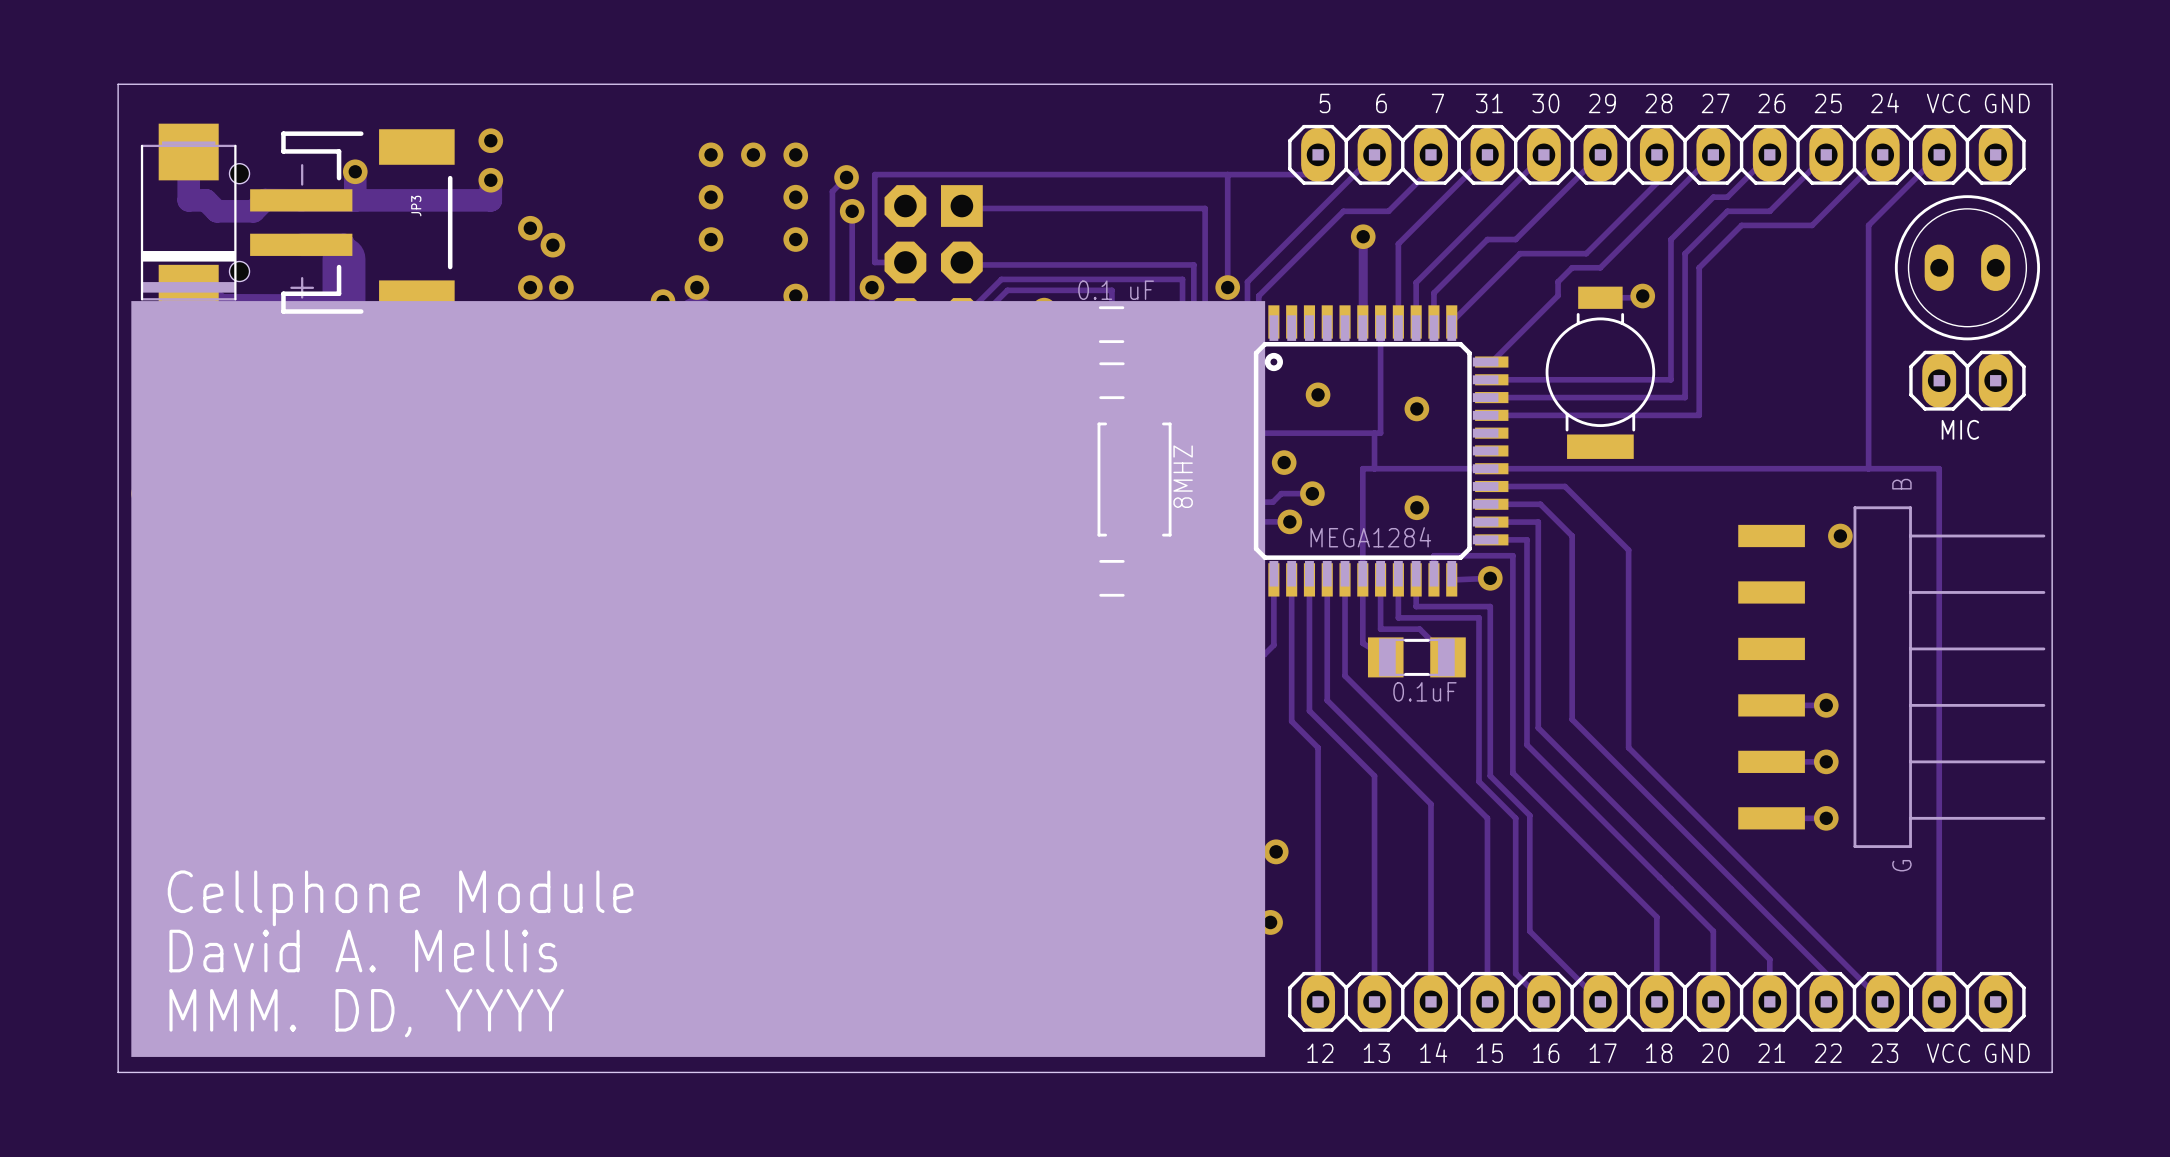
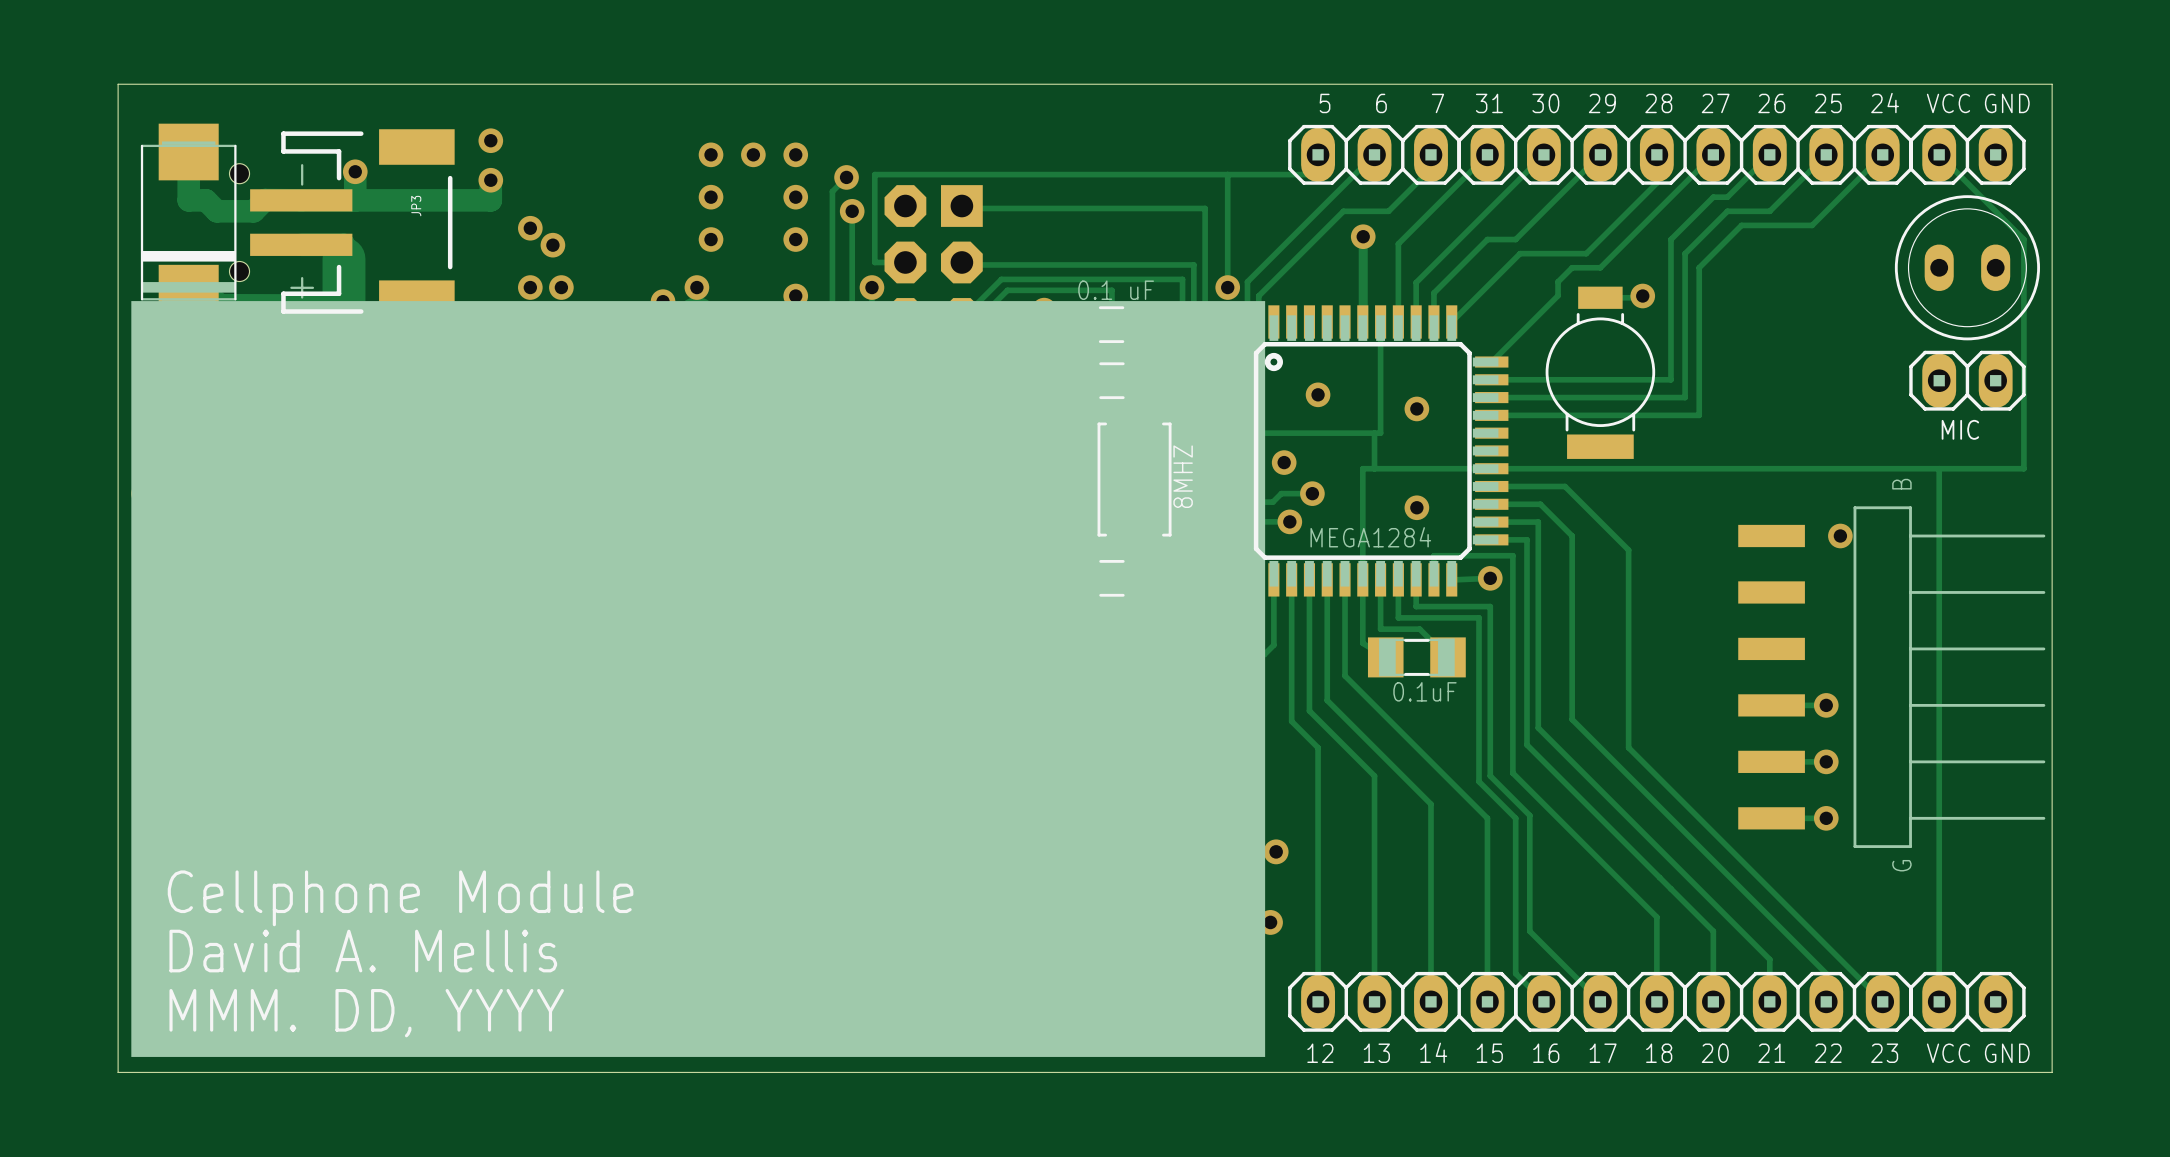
track: (1939, 154) (1868, 225) (1868, 468) -> (1939, 154) (2023, 239) (2023, 468) (1939, 468)

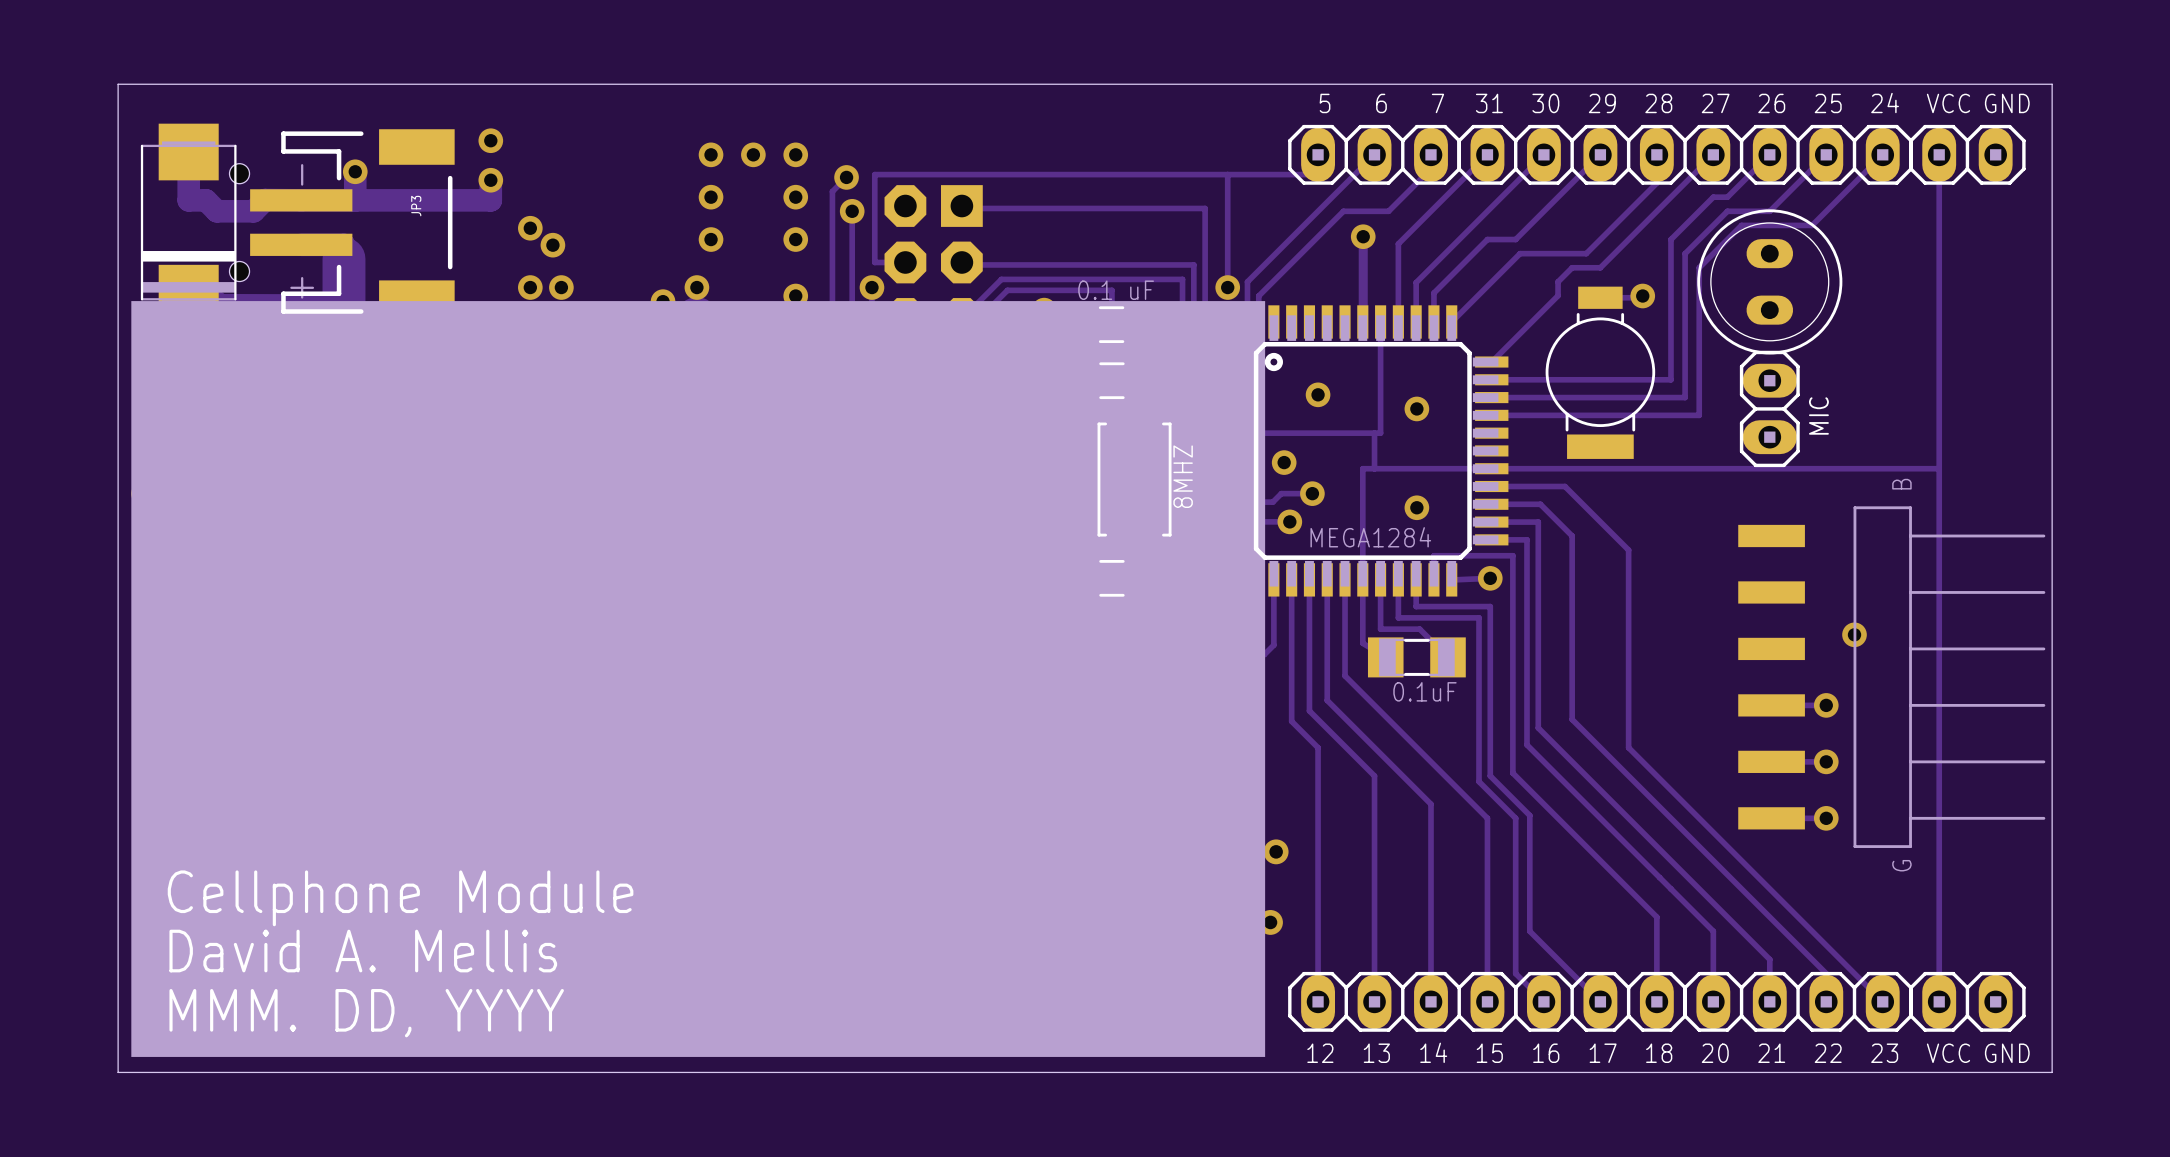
track: (1939, 154) (2023, 239) (2023, 468) (1939, 468) -> (1939, 154) (1939, 468)
part rotation: 0° (1967, 267) -> 90° clockwise (1769, 281)
part position: (1967, 267) -> (1769, 281)
MIC rotation: 0° (1967, 380) -> 90° clockwise (1769, 408)
MIC position: (1967, 380) -> (1769, 408)
MIC name position: MIC (1960, 429) -> MIC (1818, 415)
via position: (1840, 535) -> (1854, 634)

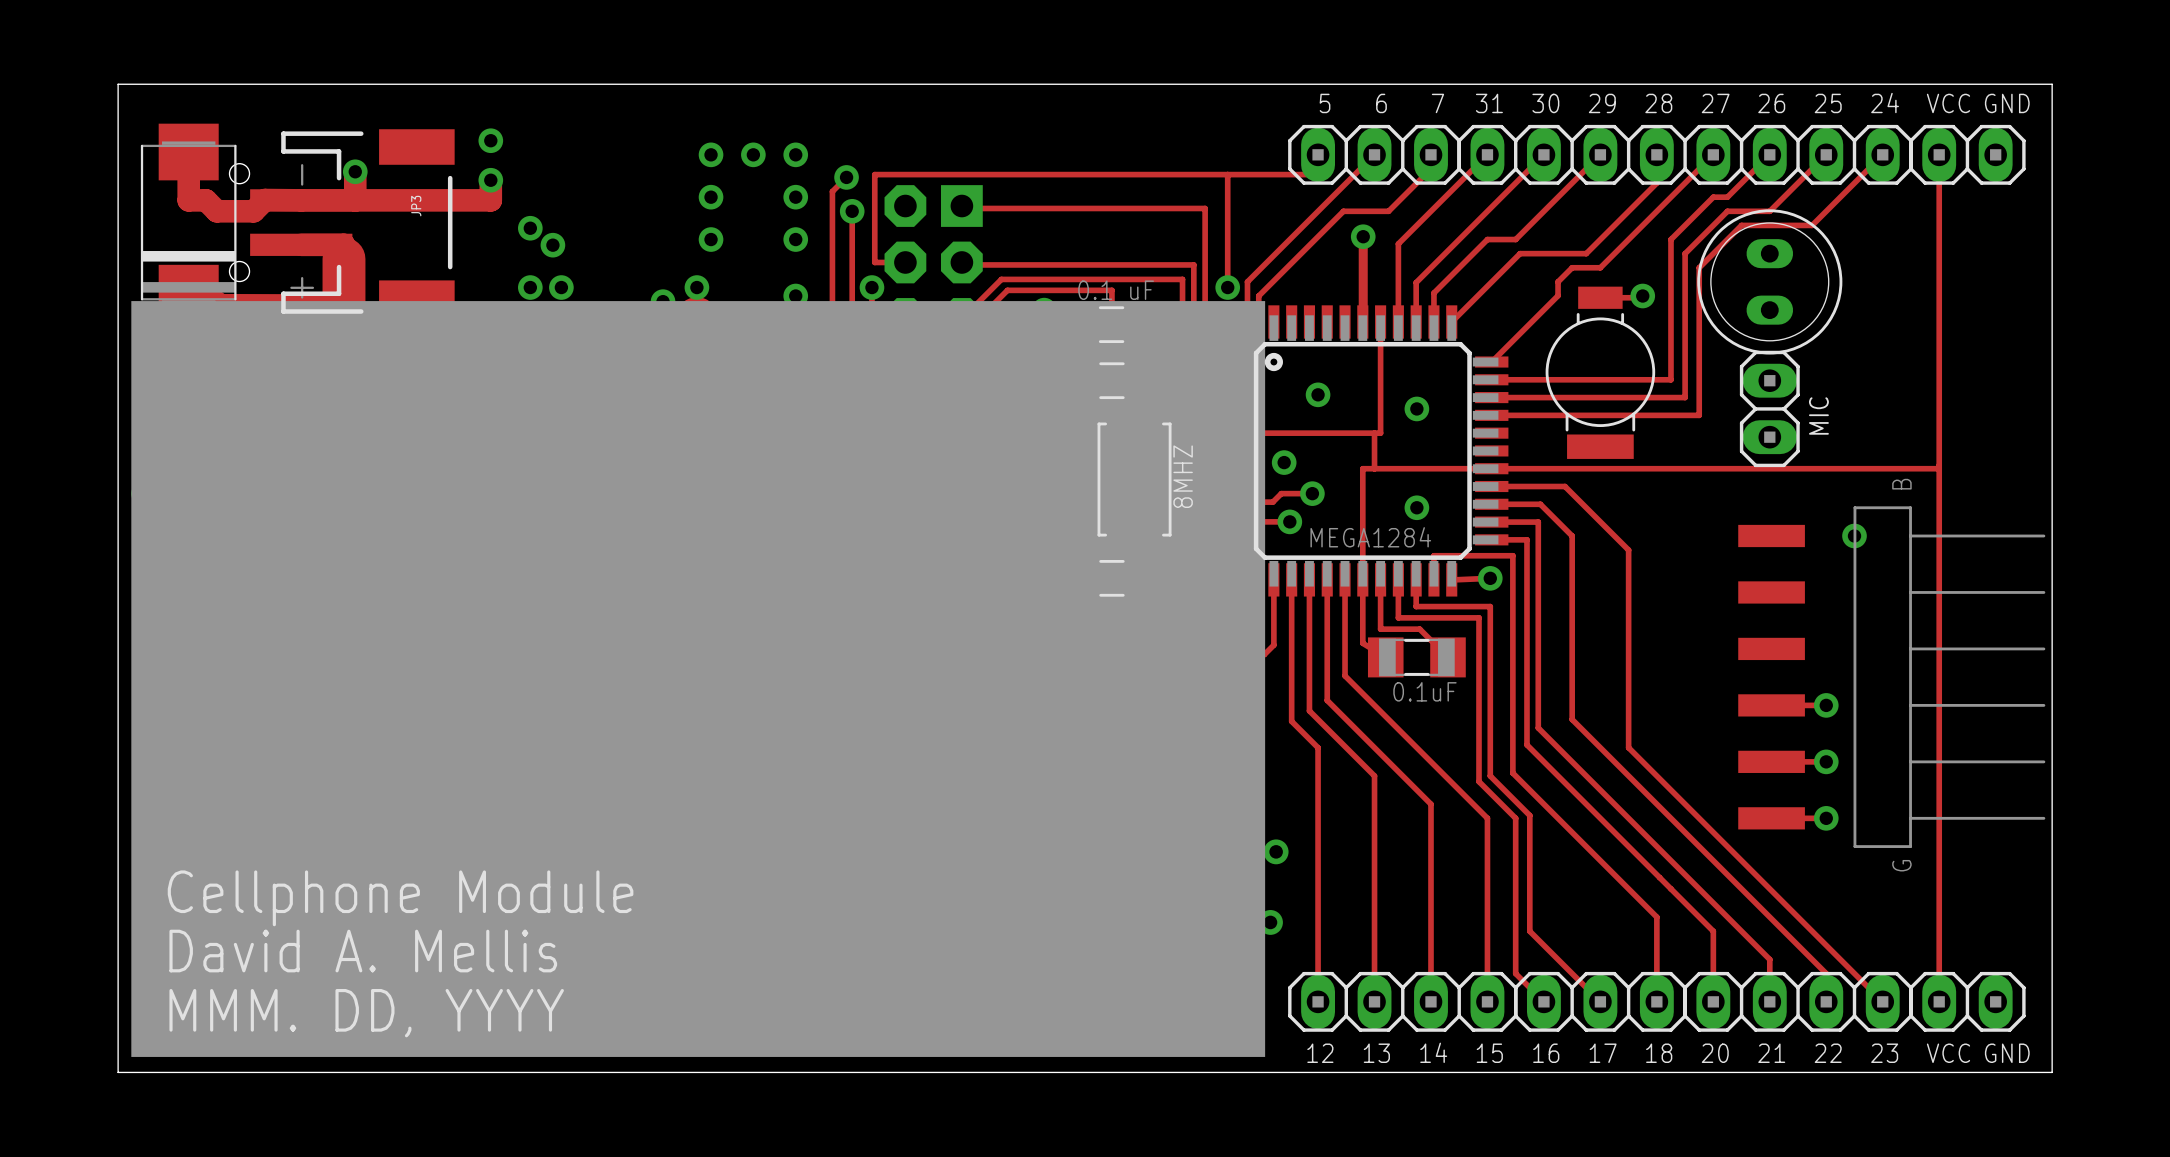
via position: (1854, 634) -> (1854, 535)

